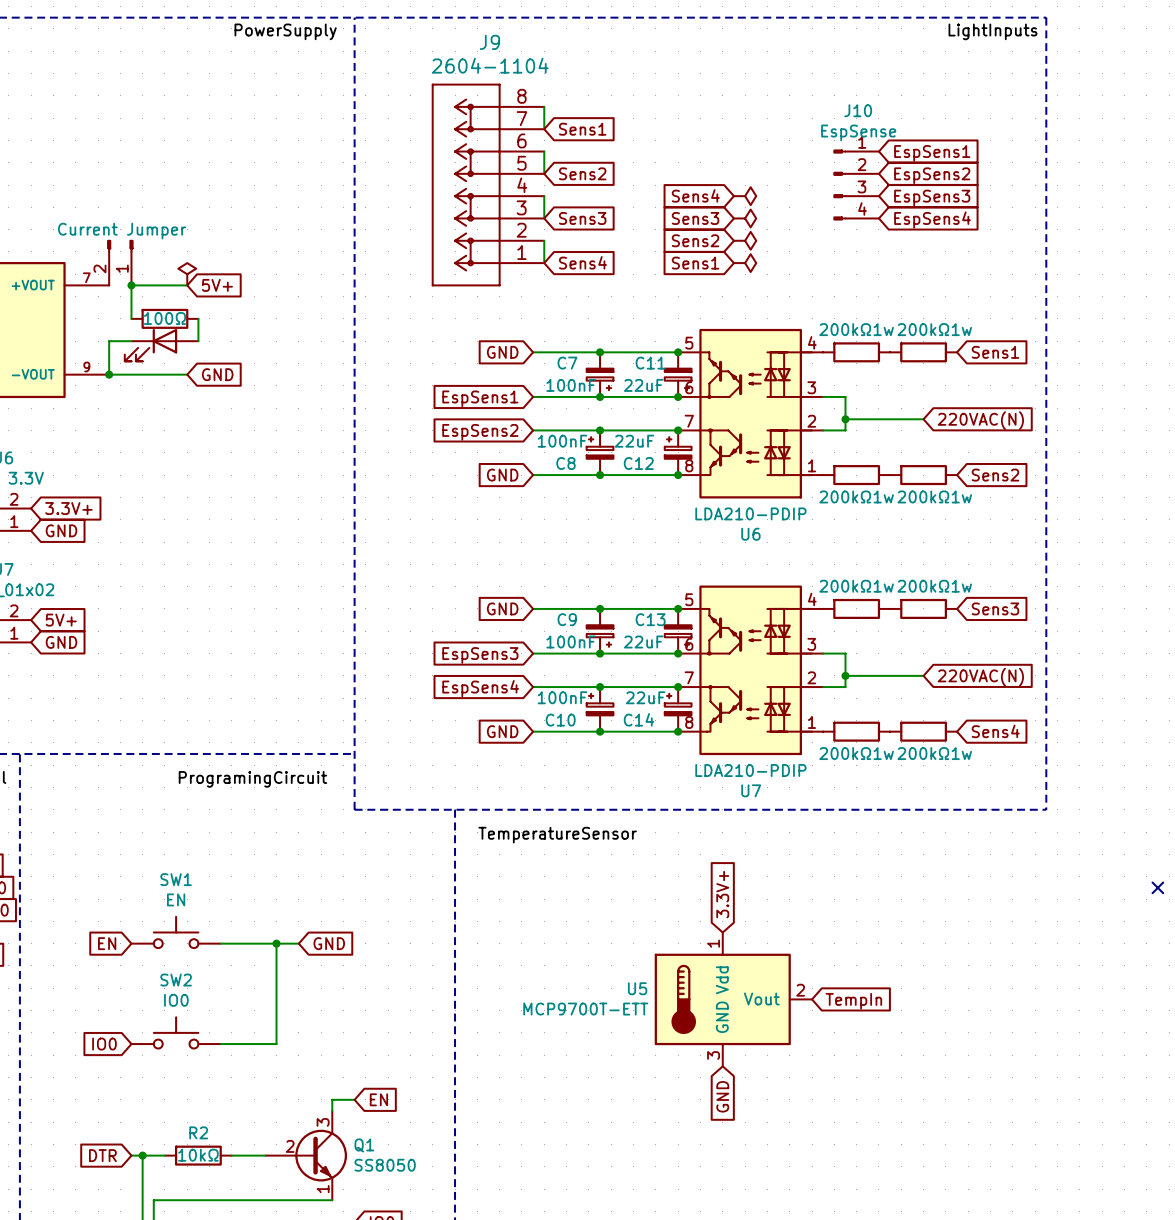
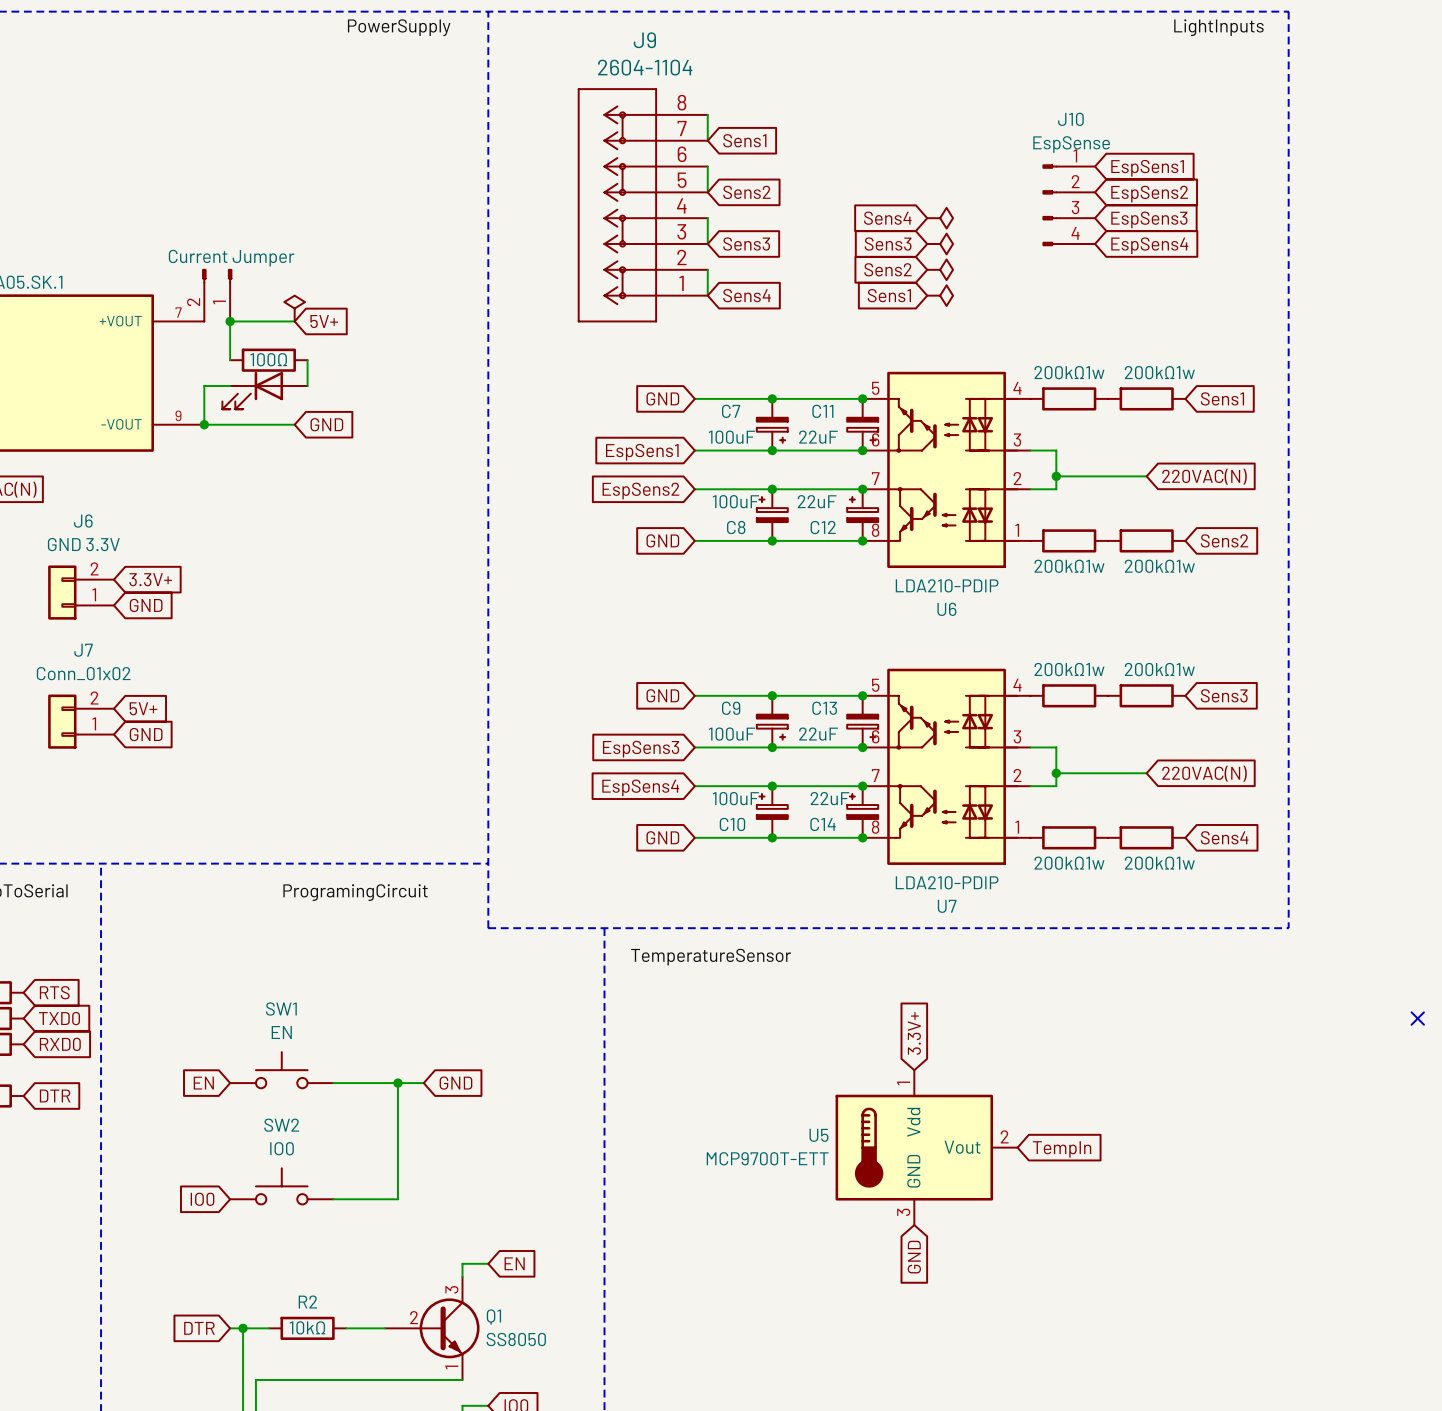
C7 value: 100nF (571, 385) -> 100uF (731, 437)
C8 value: 100nF (562, 441) -> 100uF (735, 501)
C9 value: 100nF (571, 641) -> 100uF (731, 734)
C10 value: 100nF (562, 697) -> 100uF (735, 798)

